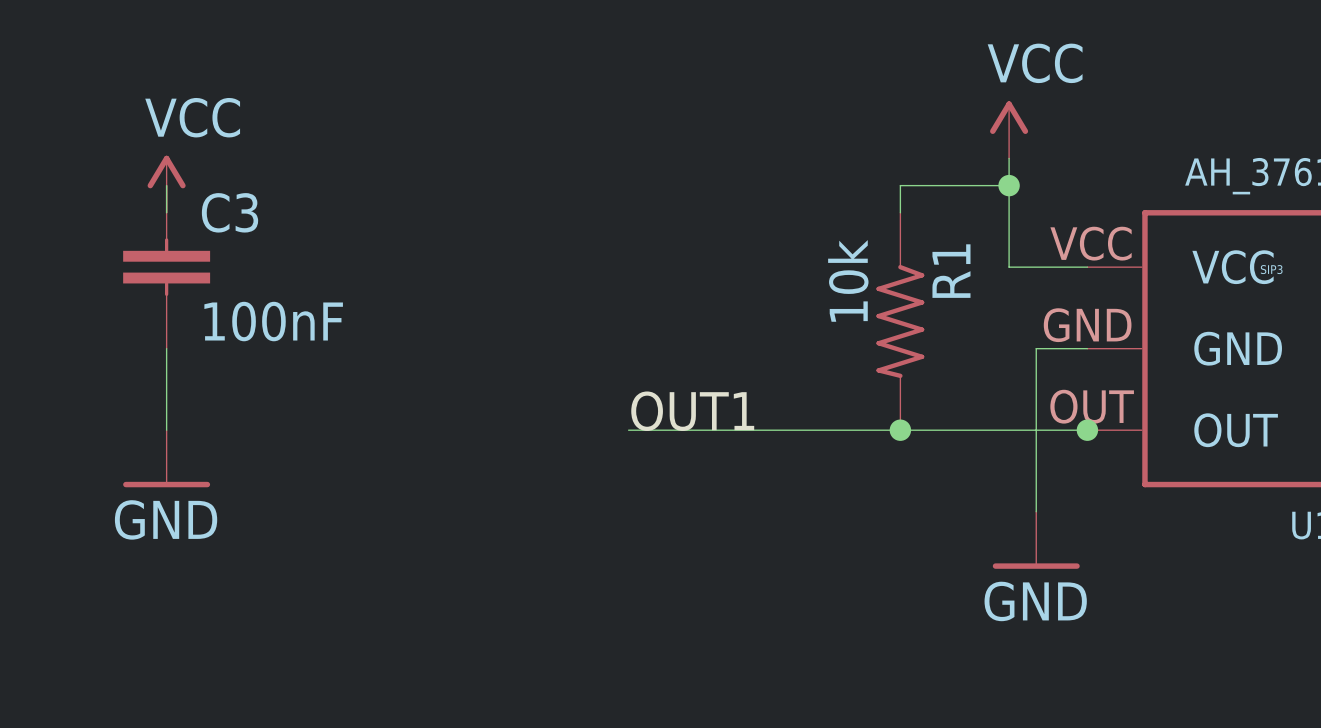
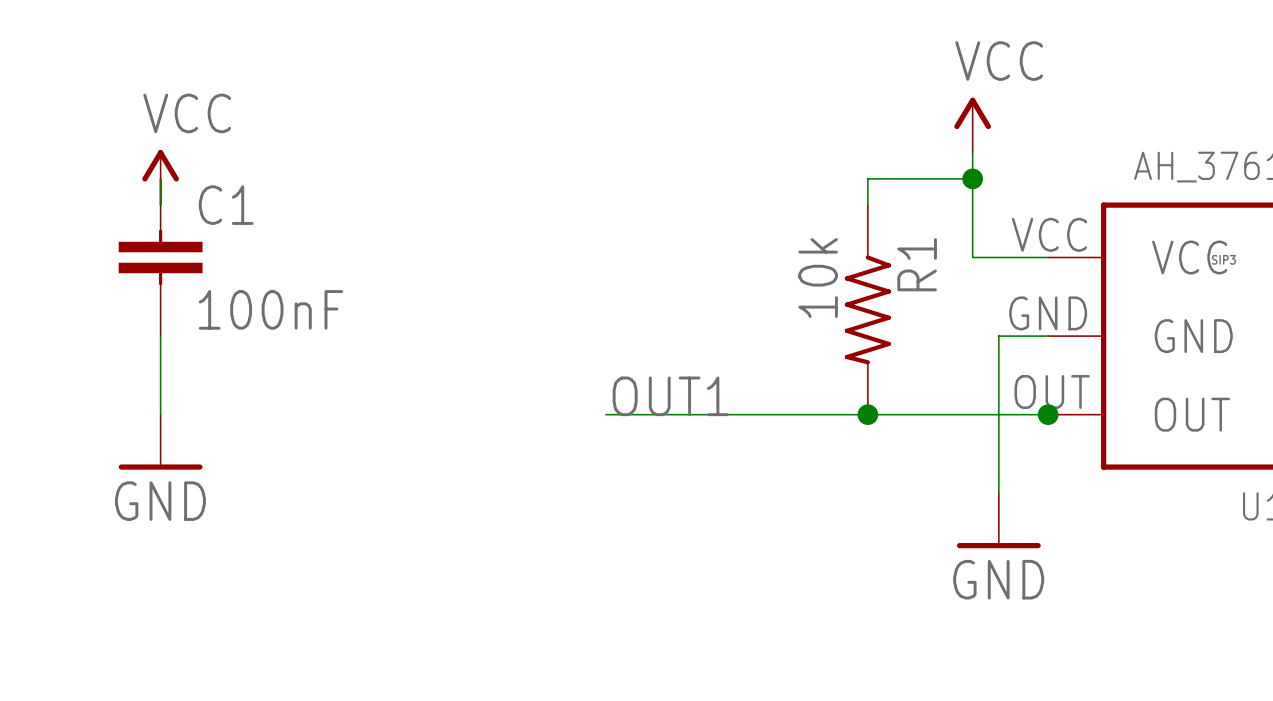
C3 name: C3 (230, 212) -> C1 (226, 205)

